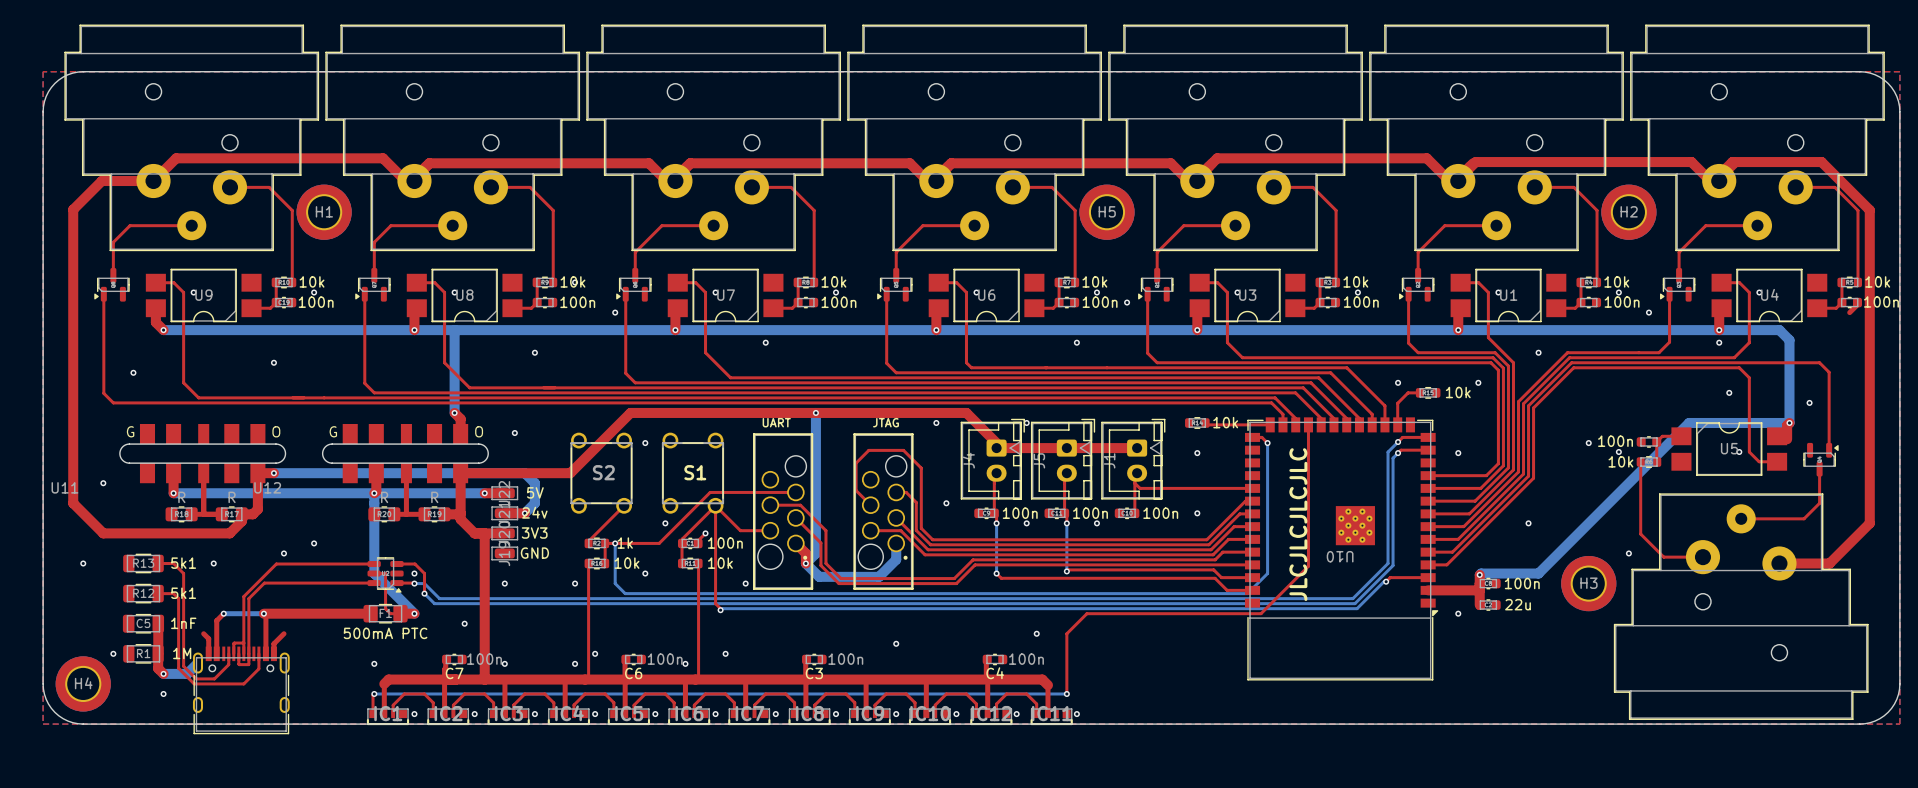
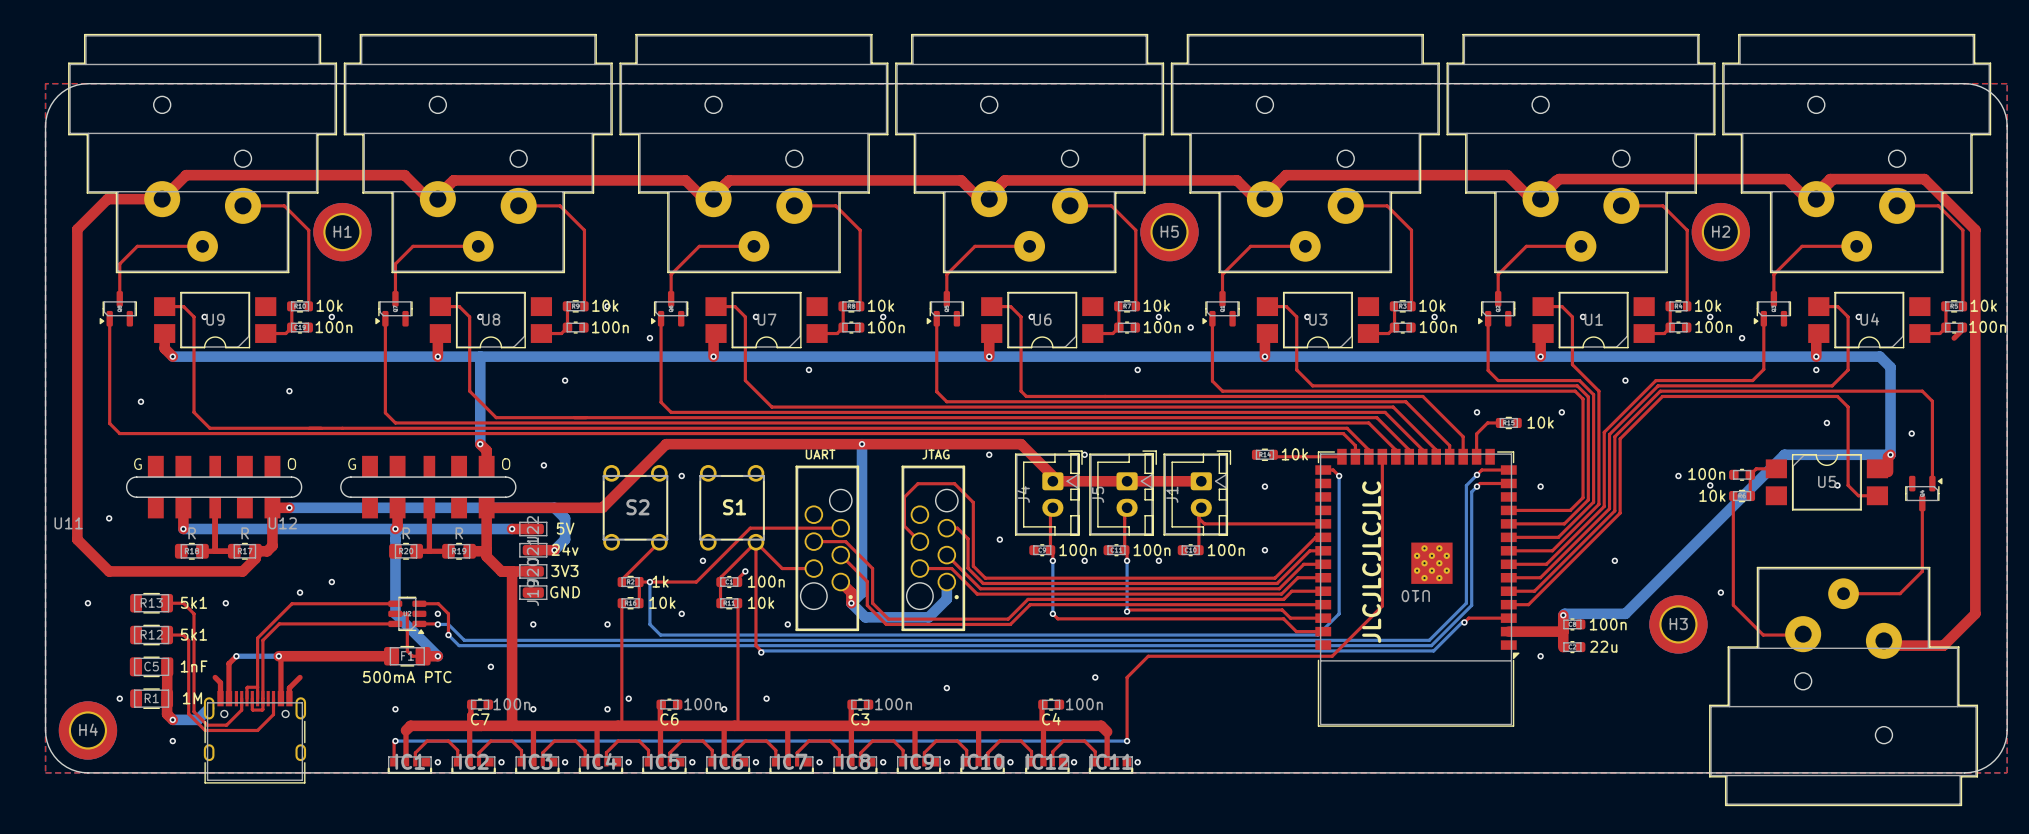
top track: (1819, 503) (1804, 518) (1741, 518) -> (1922, 539) (1922, 571) (1900, 593) (1843, 593)
top track: (1869, 523) (1829, 563) (1779, 563) -> (1975, 560) (1975, 613) (1943, 645) (1888, 645) (1883, 640)
top track: (1640, 534) (1663, 557) (1702, 557) -> (1733, 572) (1733, 605) (1763, 635) (1803, 634)
part position: (1741, 606) -> (1843, 686)

